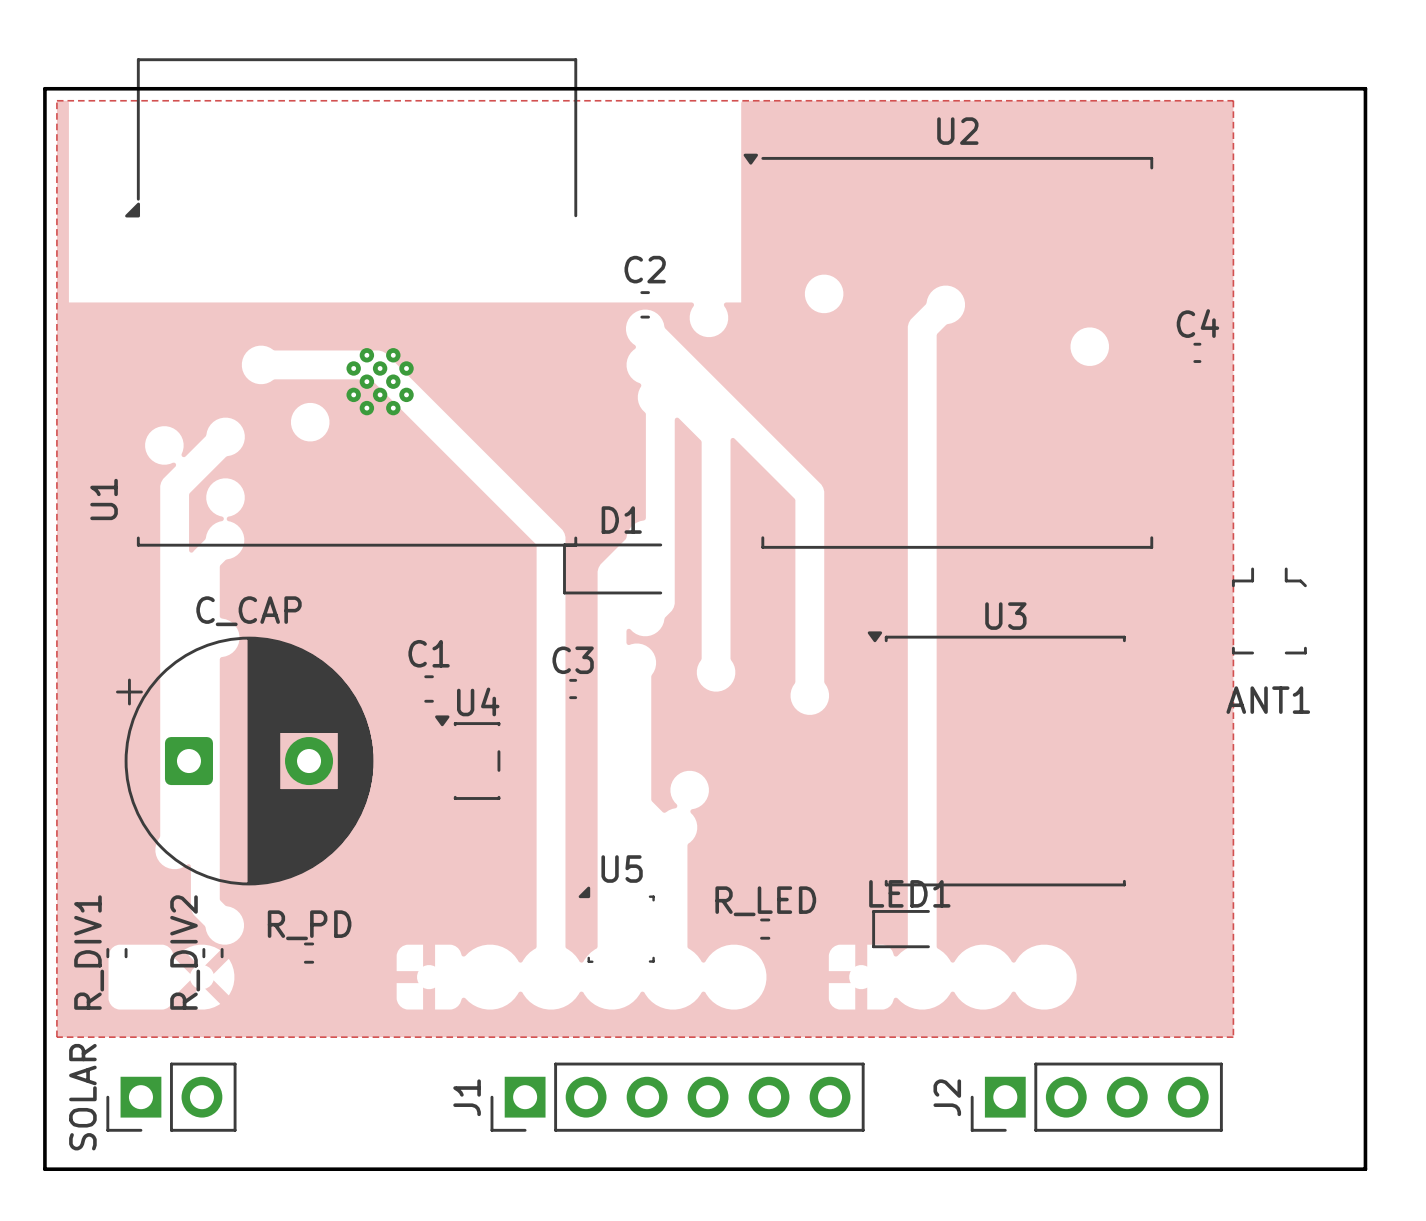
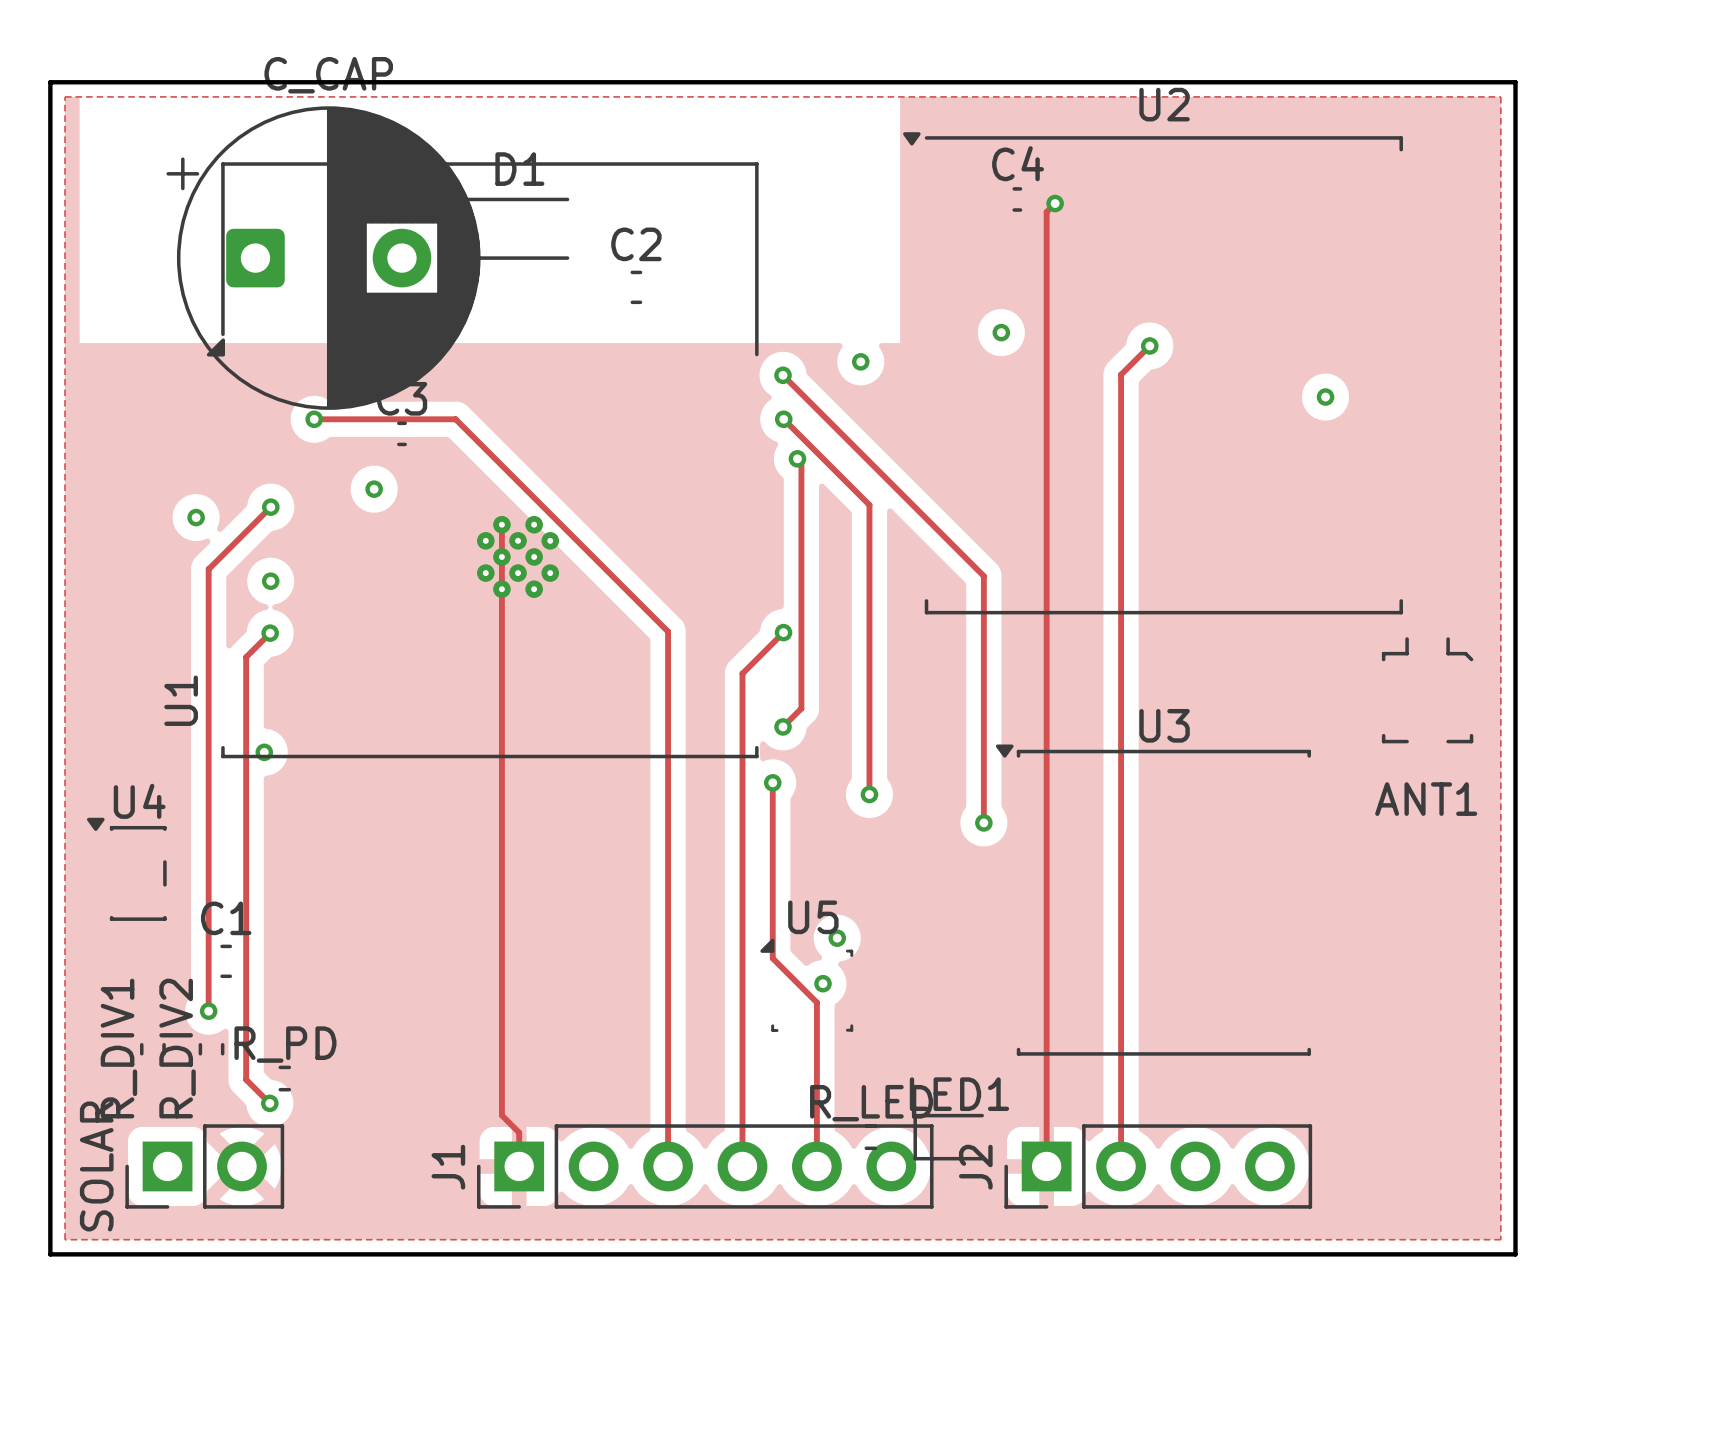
board edge: (1245, 88) (1365, 88) (1365, 1169) (44, 1169) (44, 1049) -> (1515, 82) (1515, 1254) (50, 1254)
track: none -> (1055, 203) (1046, 212) (1046, 1166)
via: none -> (1055, 203)
via: none -> (1001, 332)
U1 position: (351, 302) -> (482, 460)
C2 position: (645, 304) -> (636, 287)
track: none -> (1149, 345) (1121, 374) (1121, 1166)
via: none -> (1149, 345)
via: none -> (860, 361)
track: none -> (783, 375) (983, 576) (983, 822)
via: none -> (783, 375)
via: none -> (1325, 397)
U2 position: (948, 351) -> (1153, 373)
C4 position: (1197, 352) -> (1017, 199)
track: none -> (314, 419) (455, 419) (668, 631) (668, 1166)
via: none -> (314, 419)
track: none -> (783, 419) (869, 505) (869, 794)
via: none -> (783, 419)
track: none -> (797, 458) (801, 462) (801, 708) (783, 726)
via: none -> (797, 458)
via: none -> (374, 489)
track: none -> (270, 507) (208, 569) (208, 1011)
via: none -> (270, 507)
via: none -> (196, 517)
track: none -> (501, 524) (501, 1115) (519, 1132) (519, 1166)
via: none -> (270, 581)
track: none -> (783, 632) (742, 673) (742, 1166)
via: none -> (783, 632)
track: none -> (270, 633) (246, 657) (246, 1079) (269, 1103)
via: none -> (270, 633)
D1 position: (612, 568) -> (508, 228)
ANT1 position: (1269, 610) -> (1427, 690)
via: none -> (783, 726)
via: none -> (264, 752)
track: none -> (772, 782) (772, 958) (816, 1002) (816, 1166)
via: none -> (772, 782)
via: none -> (869, 794)
C1 position: (429, 689) -> (226, 961)
C3 position: (573, 689) -> (401, 433)
via: none -> (983, 822)
U4 position: (467, 757) -> (126, 869)
U3 position: (996, 758) -> (1153, 900)
C_CAP position: (244, 761) -> (323, 258)
via: none -> (837, 938)
via: none -> (822, 983)
via: none -> (208, 1011)
U5 position: (616, 924) -> (806, 985)
via: none -> (269, 1103)
R_LED position: (765, 929) -> (870, 1137)
LED1 position: (901, 929) -> (948, 1137)
R_DIV1 position: (116, 953) -> (152, 1049)
R_DIV2 position: (212, 953) -> (211, 1049)
R_PD position: (309, 953) -> (284, 1078)
SOLAR position: (171, 1097) -> (204, 1166)
J1 position: (677, 1097) -> (705, 1166)
J2 position: (1096, 1097) -> (1158, 1166)

